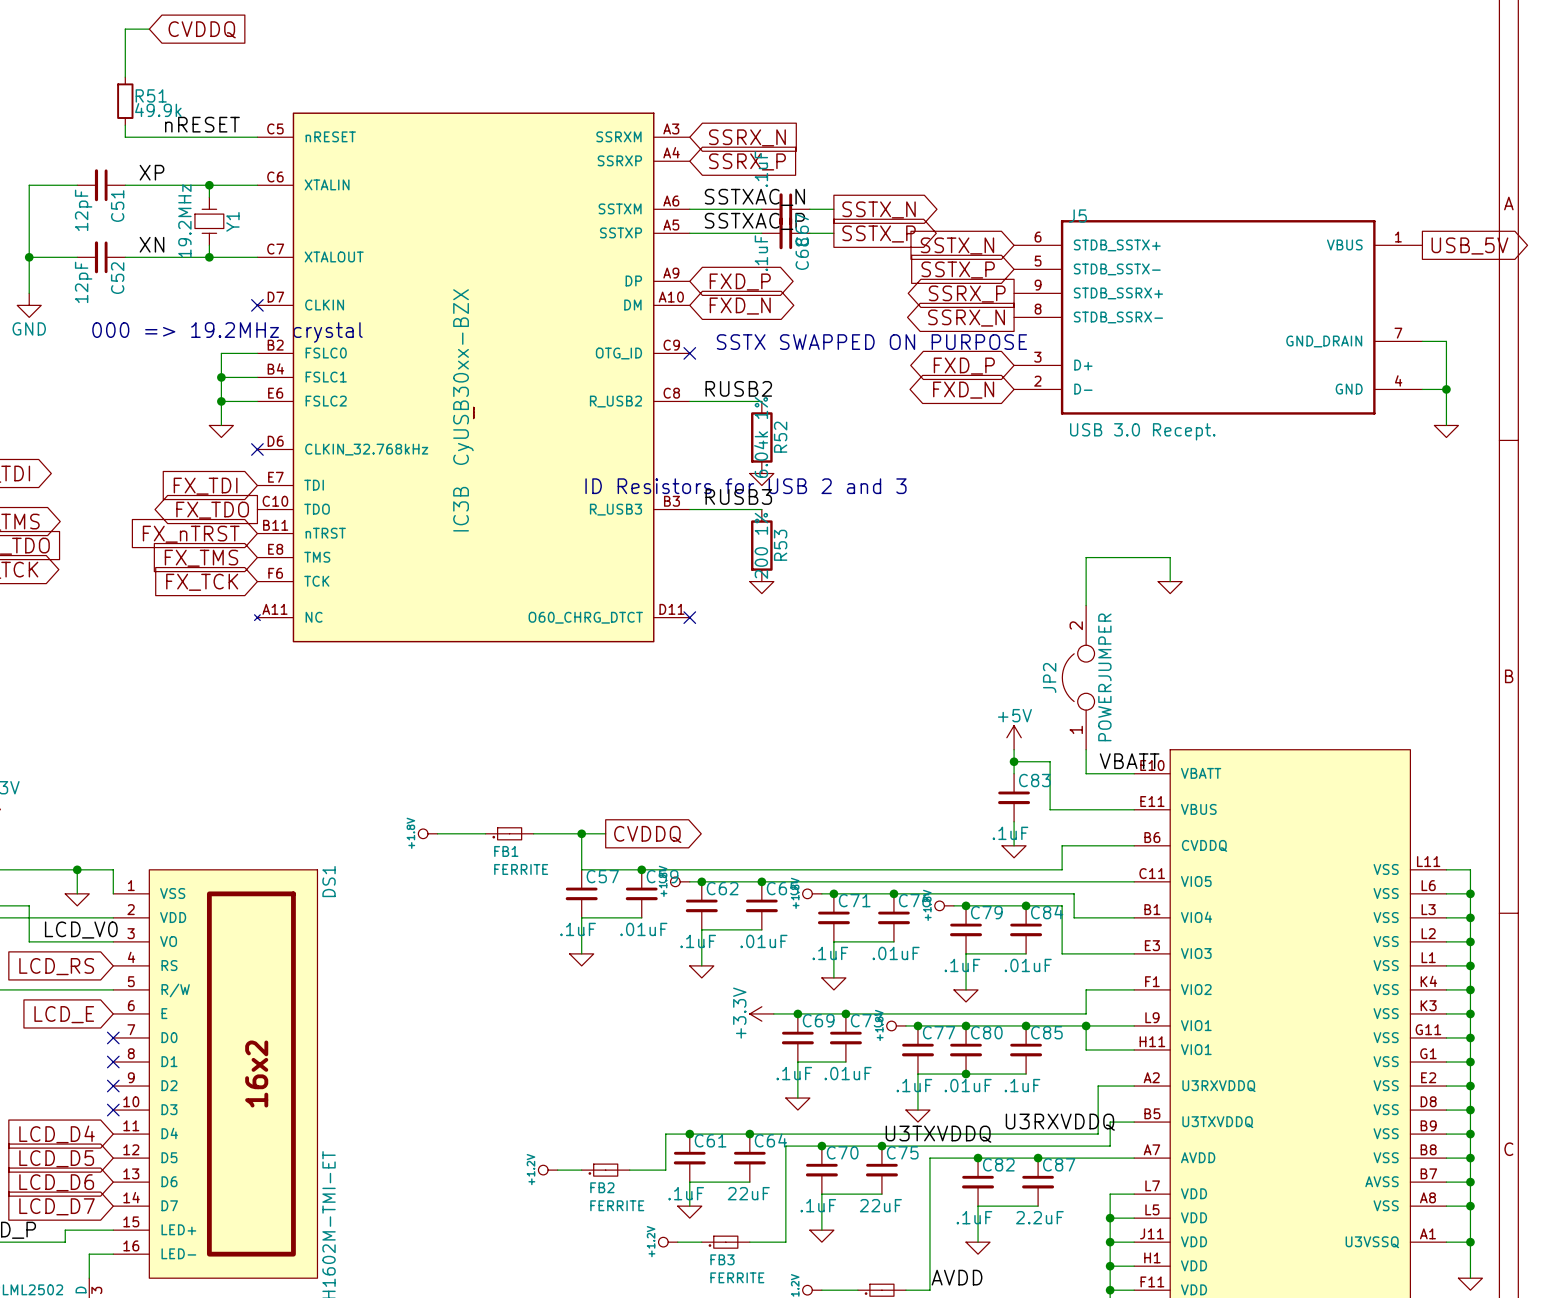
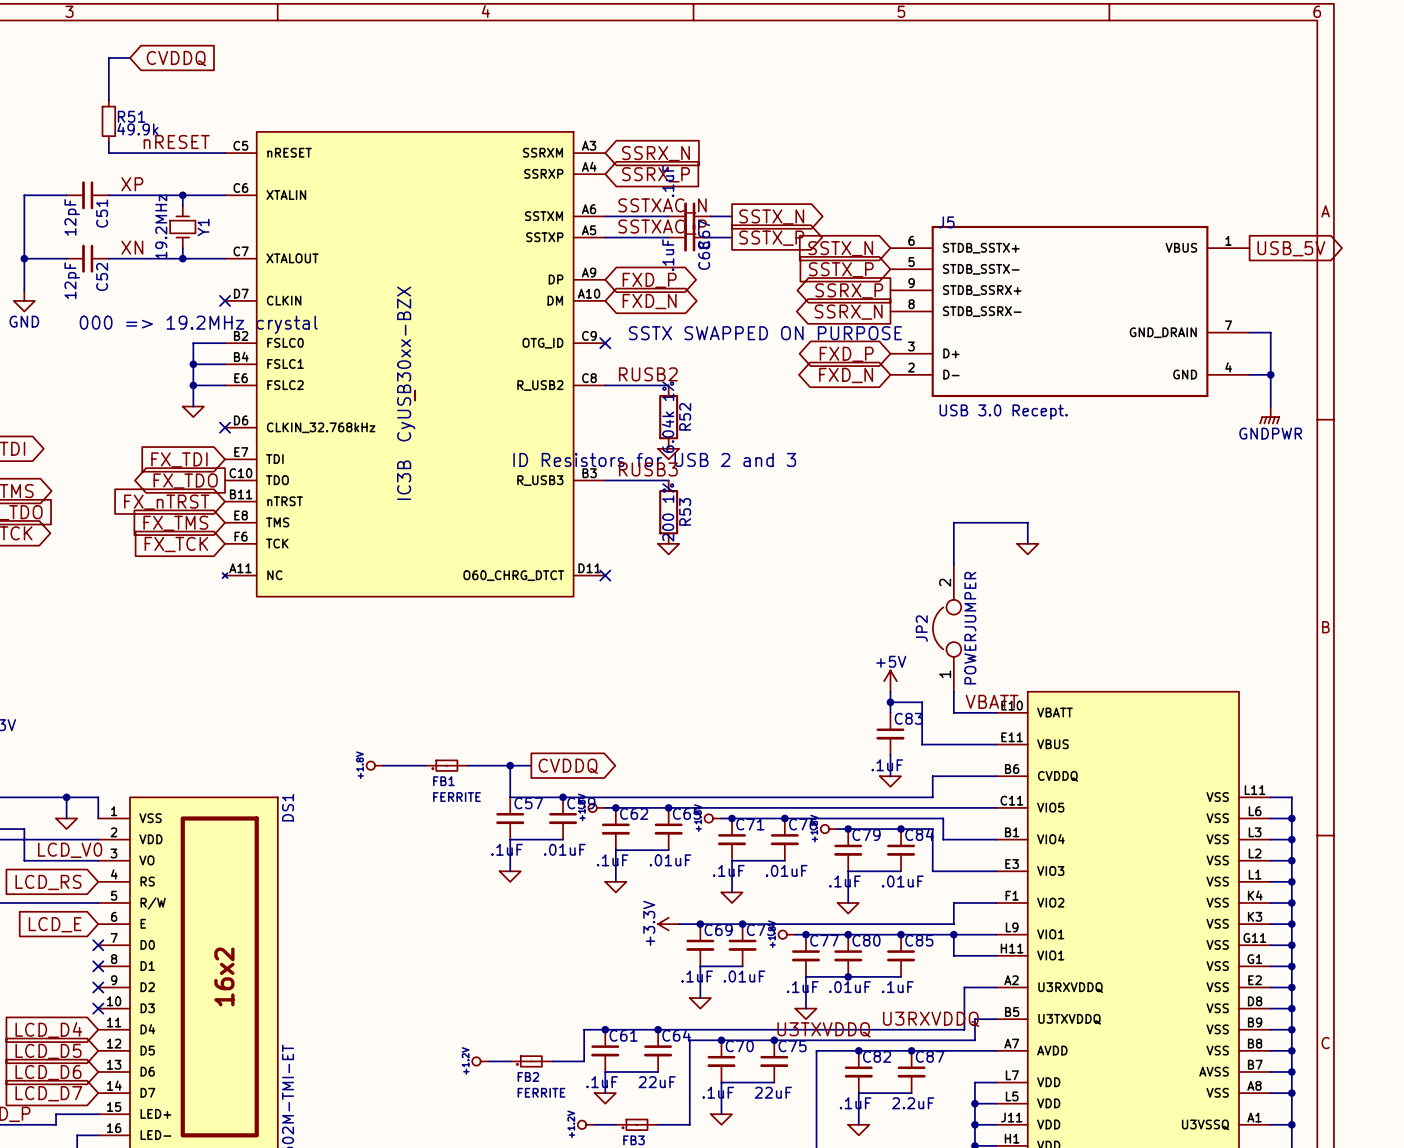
power symbol shape: [1434, 425, 1459, 438] -> [1259, 406, 1281, 425]
power symbol text: none -> GNDPWR (1270, 433)

